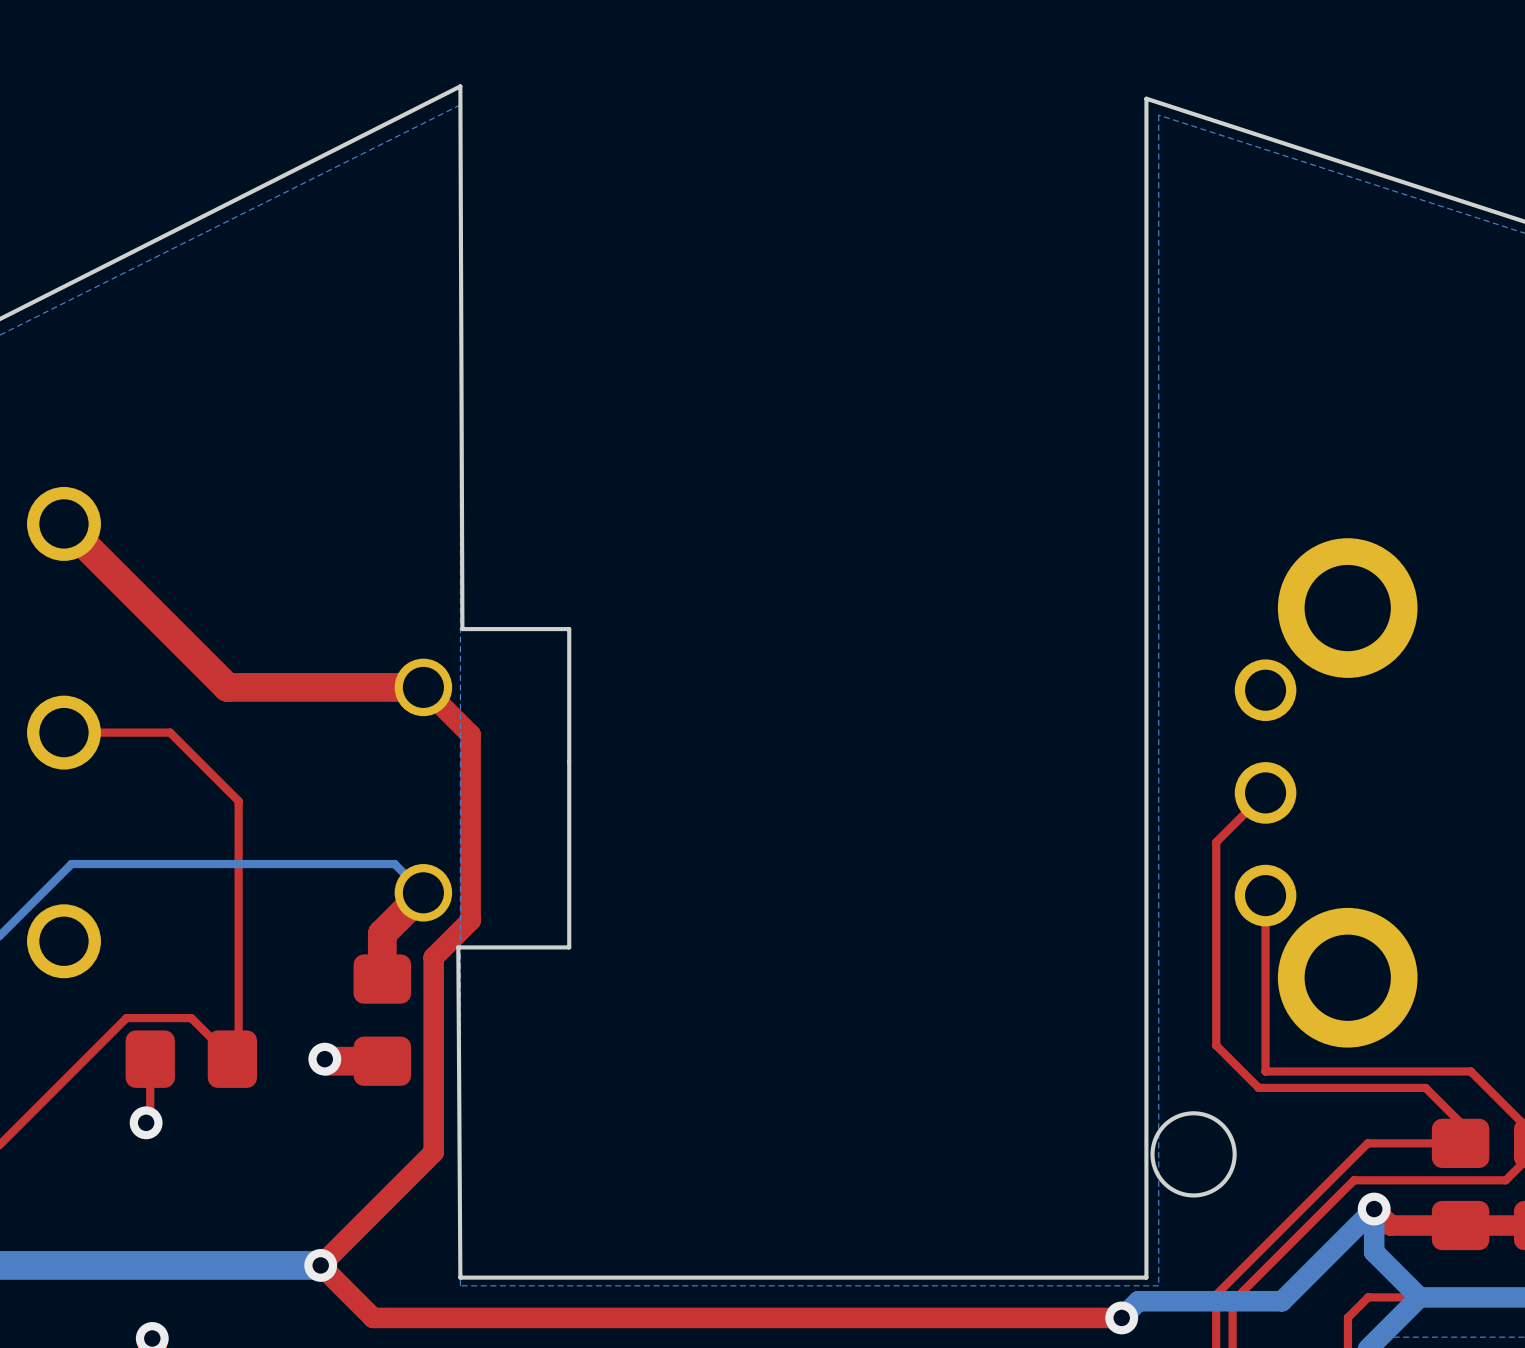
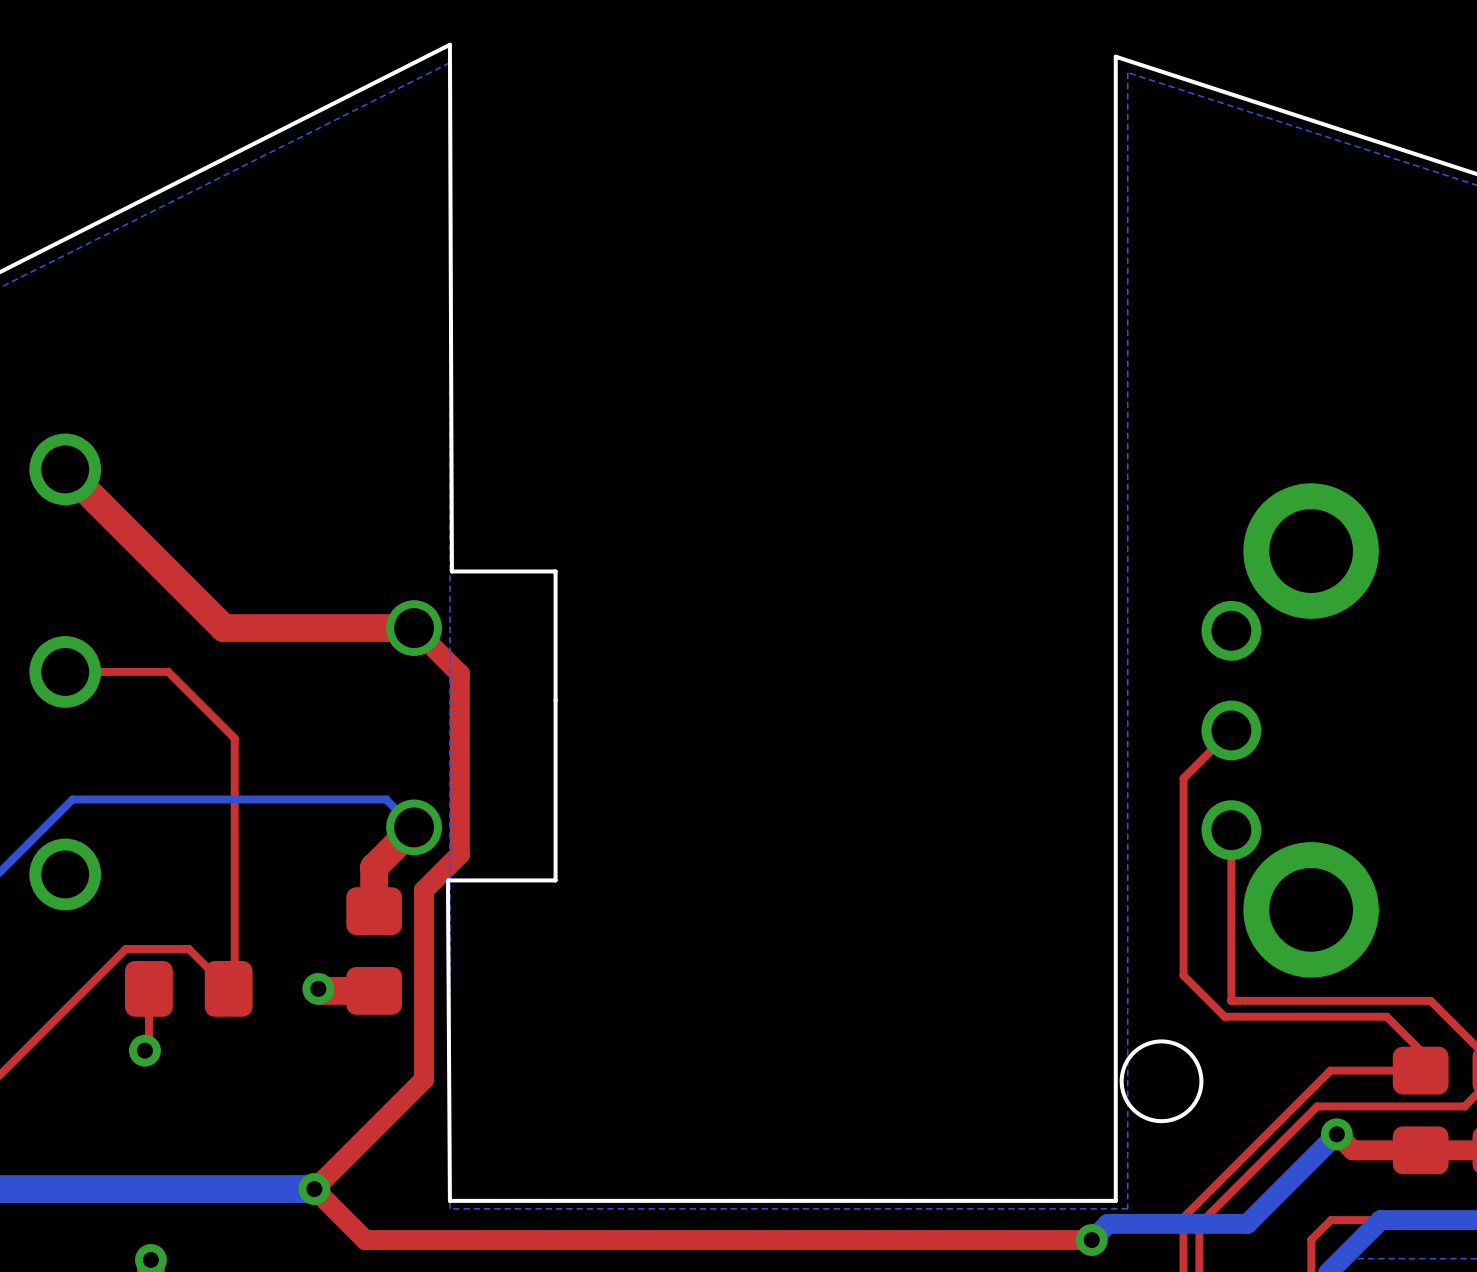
bottom track: (1374, 1209) (1374, 1252) (1419, 1297) -> none

